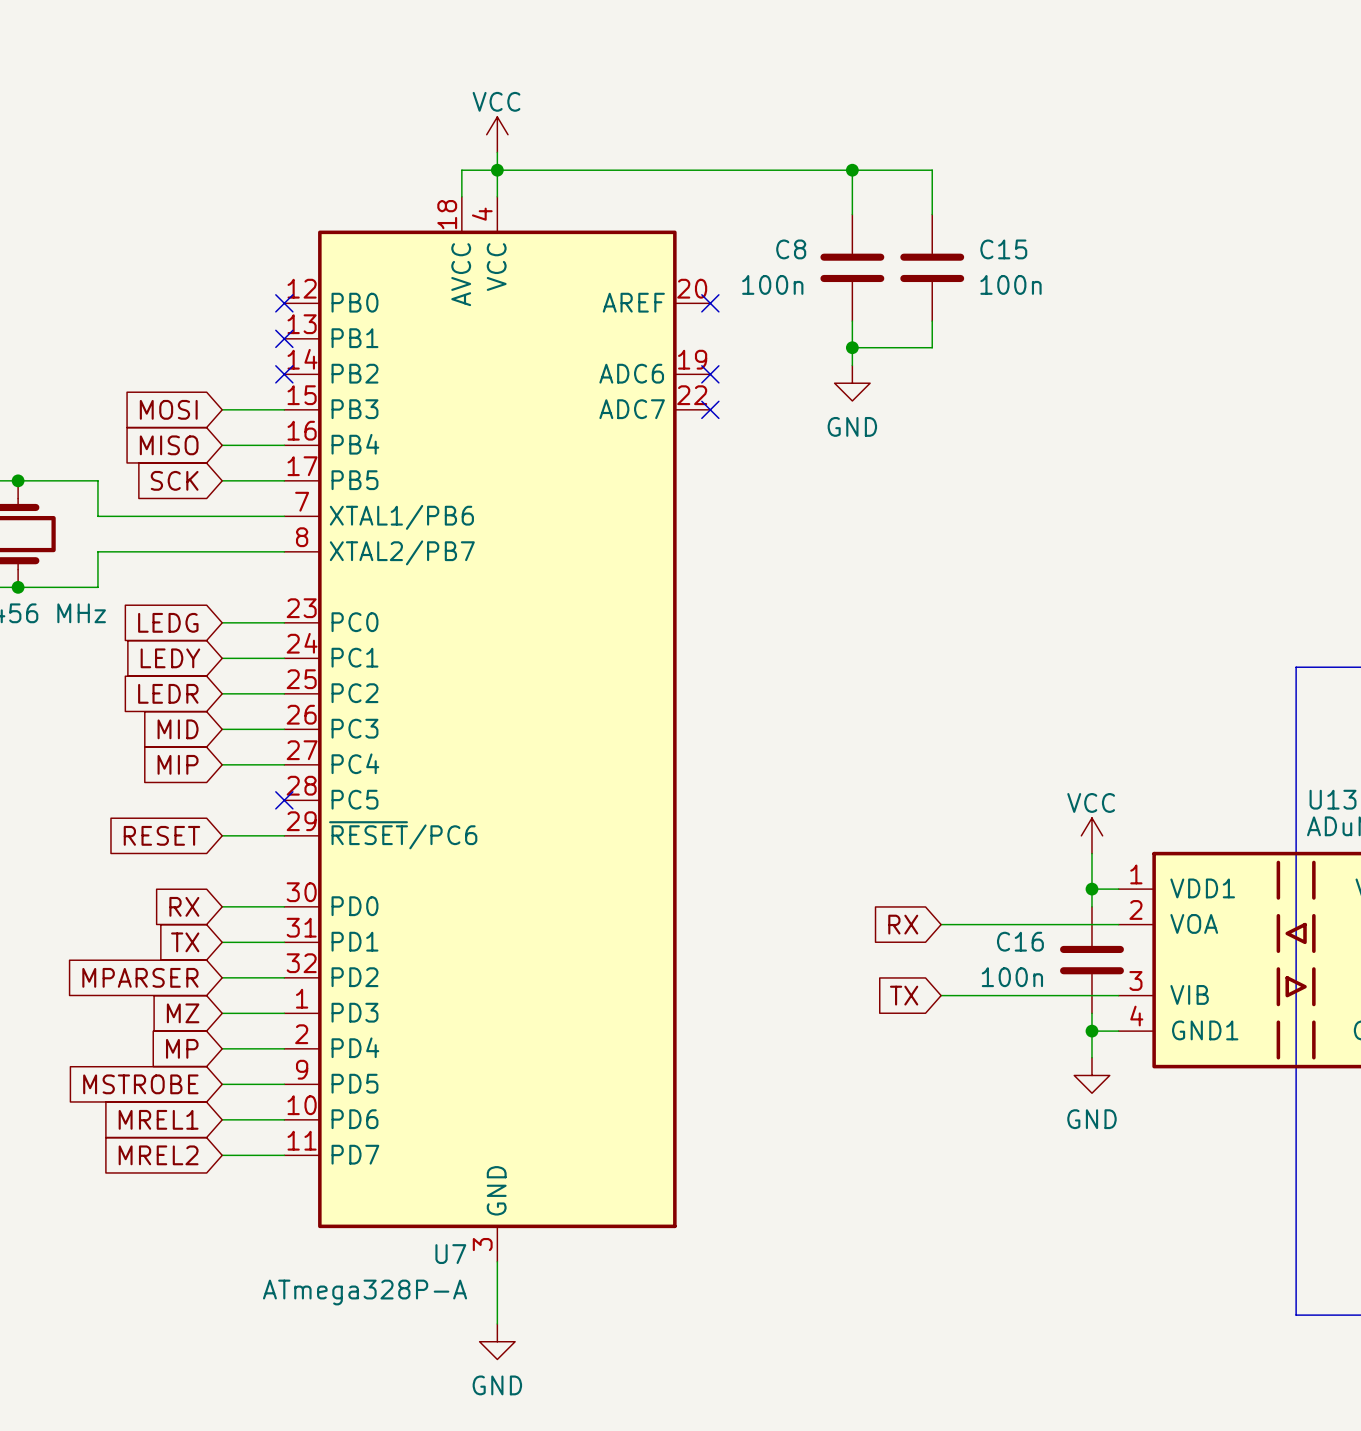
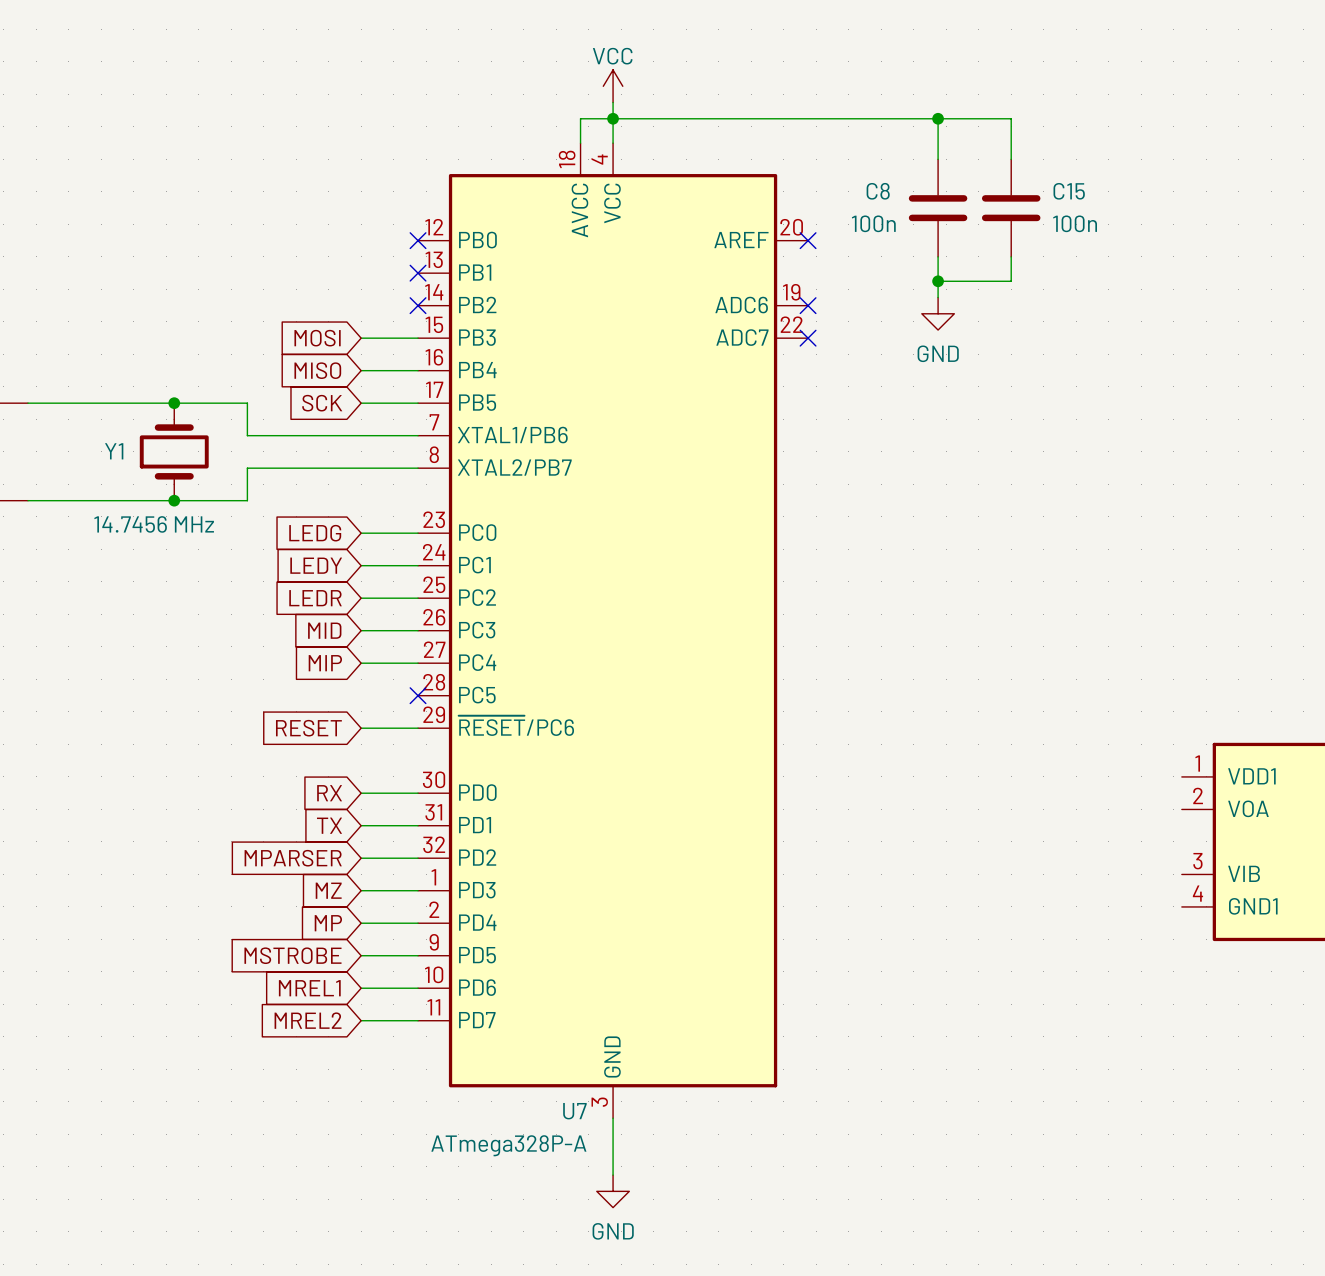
power symbol: VCC (1091, 835) -> none
wire: (1091, 853) (1091, 906) -> none
wire: (1091, 889) (1118, 889) -> none
junction: (1091, 889) -> none
global label: RX (903, 924) -> none
wire: (941, 924) (1118, 924) -> none
C16: 100n (1091, 960) -> none
global label: TX (904, 995) -> none
wire: (941, 995) (1118, 995) -> none
wire: (1091, 1013) (1091, 1057) -> none
wire: (1091, 1031) (1118, 1031) -> none
junction: (1091, 1031) -> none
power symbol: GND (1091, 1075) -> none

